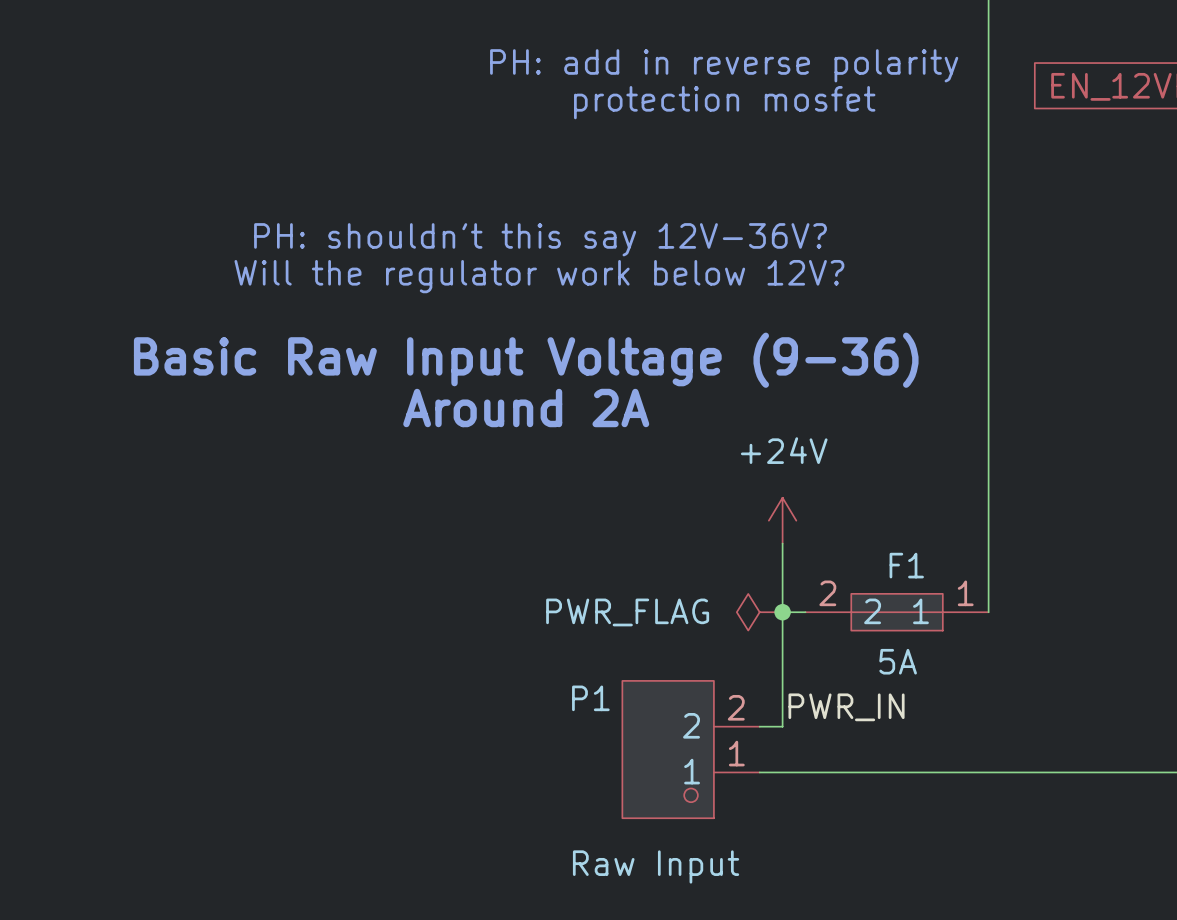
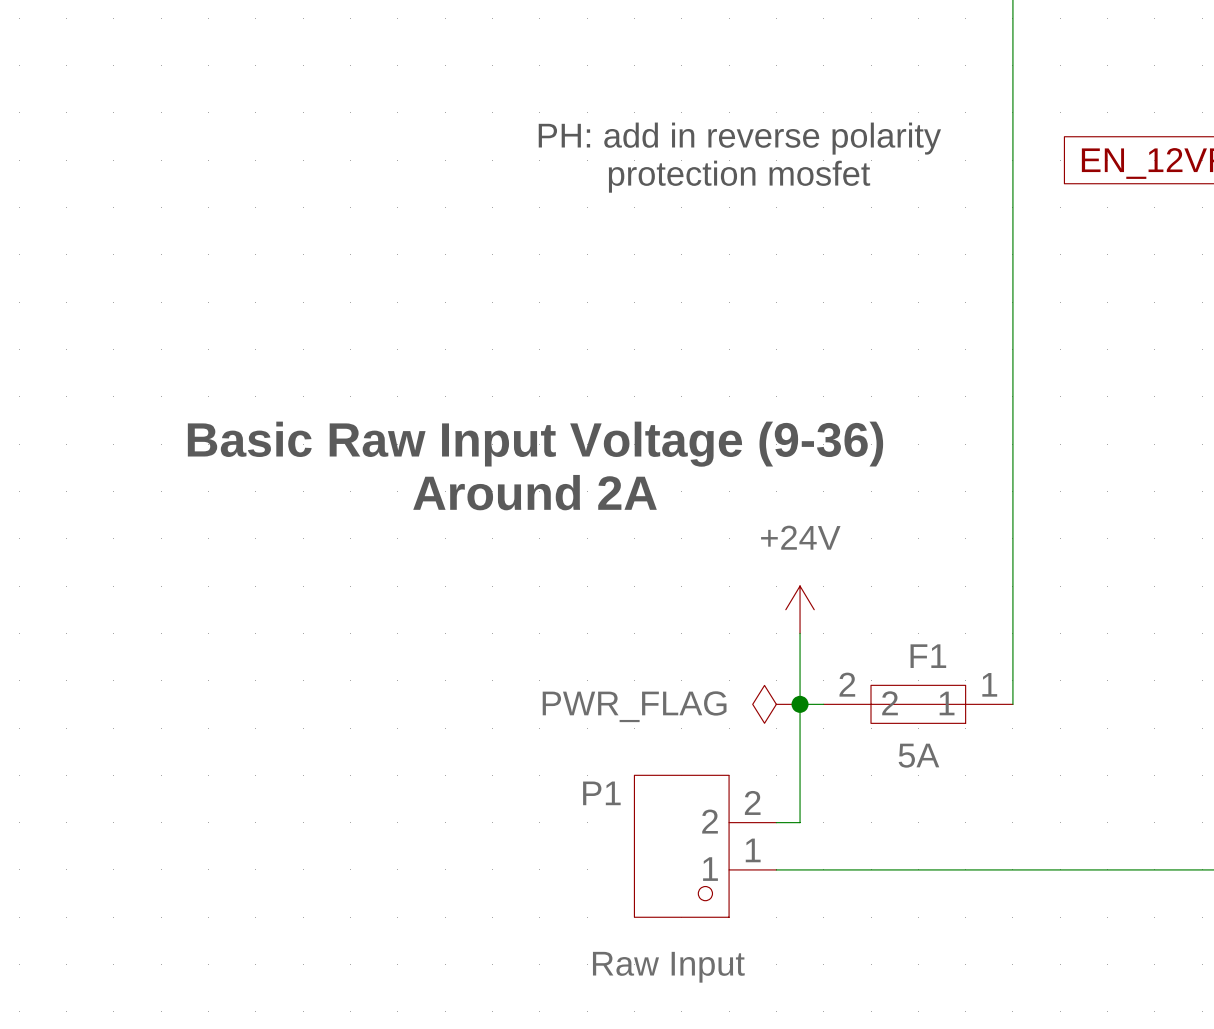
text: PH: shouldn't this say 12V-36V? (540, 239) -> none
text: Will the regulator work below 12V? (539, 276) -> none
label: PWR_IN (846, 707) -> none

